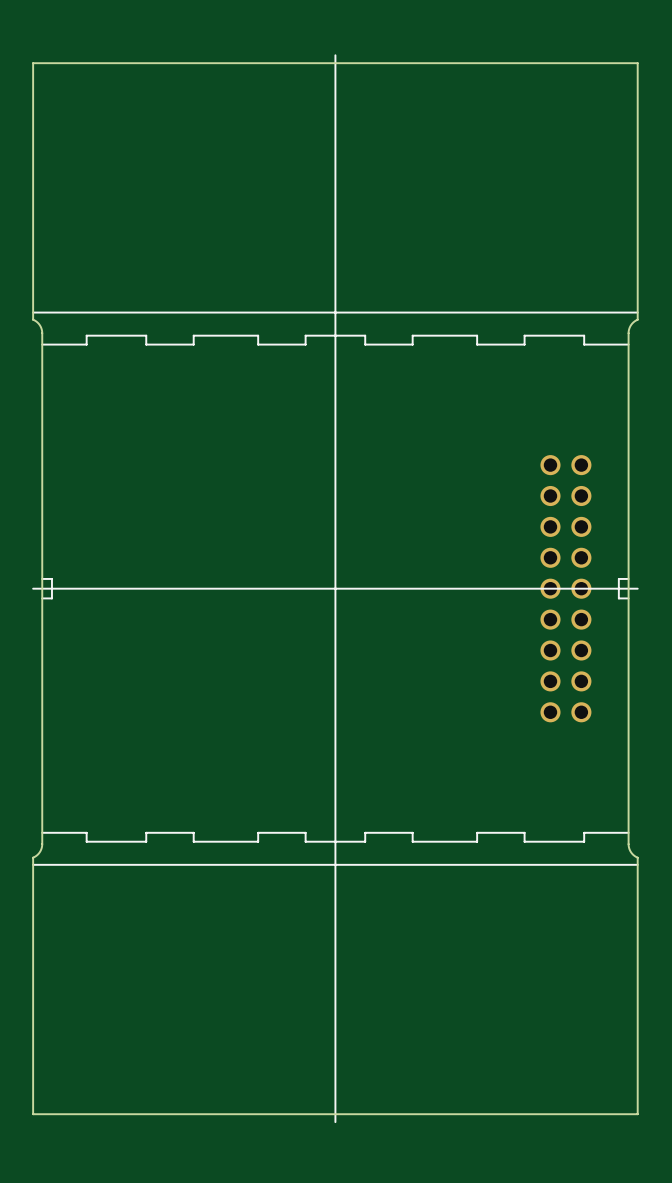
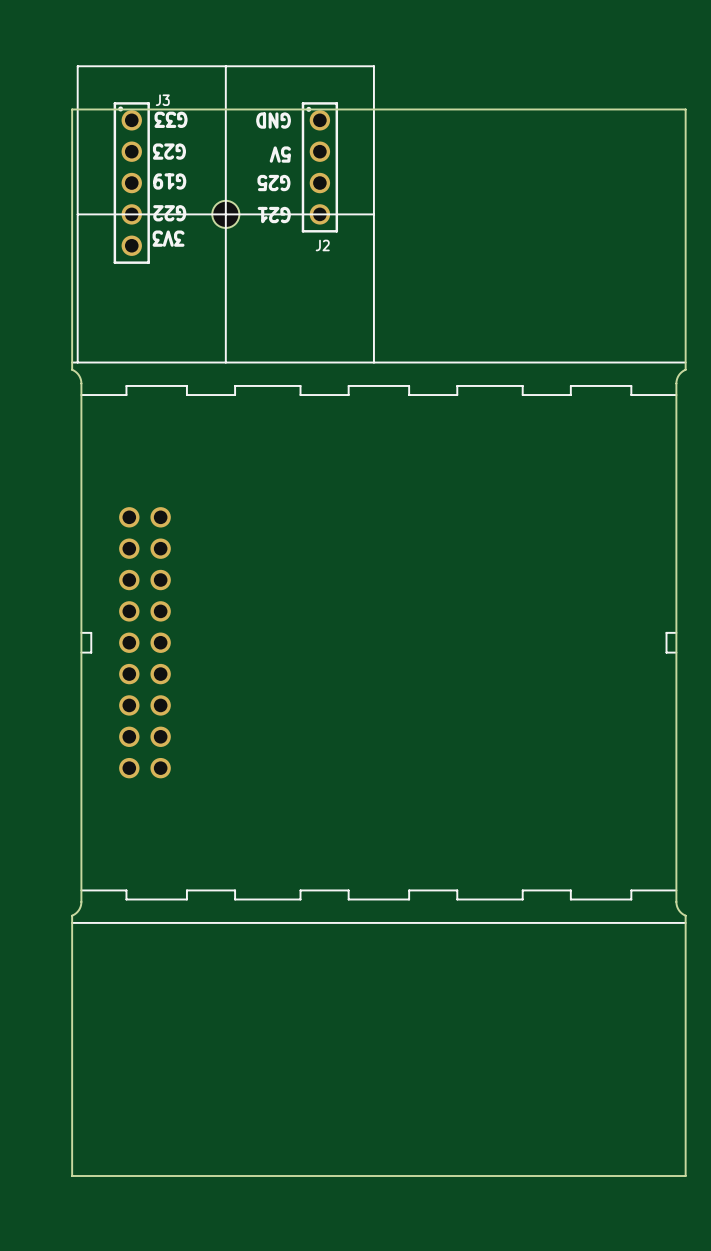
line: none -> (225, 66) (225, 362)
line: (335, 55) (335, 1122) -> none
text: none -> G33 (171, 119)
text: none -> GND (273, 120)
text: none -> G23 (169, 151)
text: none -> 5V (280, 154)
J2: none -> (319, 167)
text: none -> G19 (169, 181)
J3: none -> (131, 183)
text: none -> G25 (273, 183)
text: none -> G22 (169, 213)
line: none -> (77, 214) (373, 214)
hole: none -> (225, 214)
text: none -> G21 (274, 215)
text: none -> 3V3 (168, 238)
line: none -> (77, 362) (77, 66) (373, 66) (373, 362)
line: (33, 588) (637, 588) -> none
part: none -> (144, 642)
part: (565, 588) -> none

